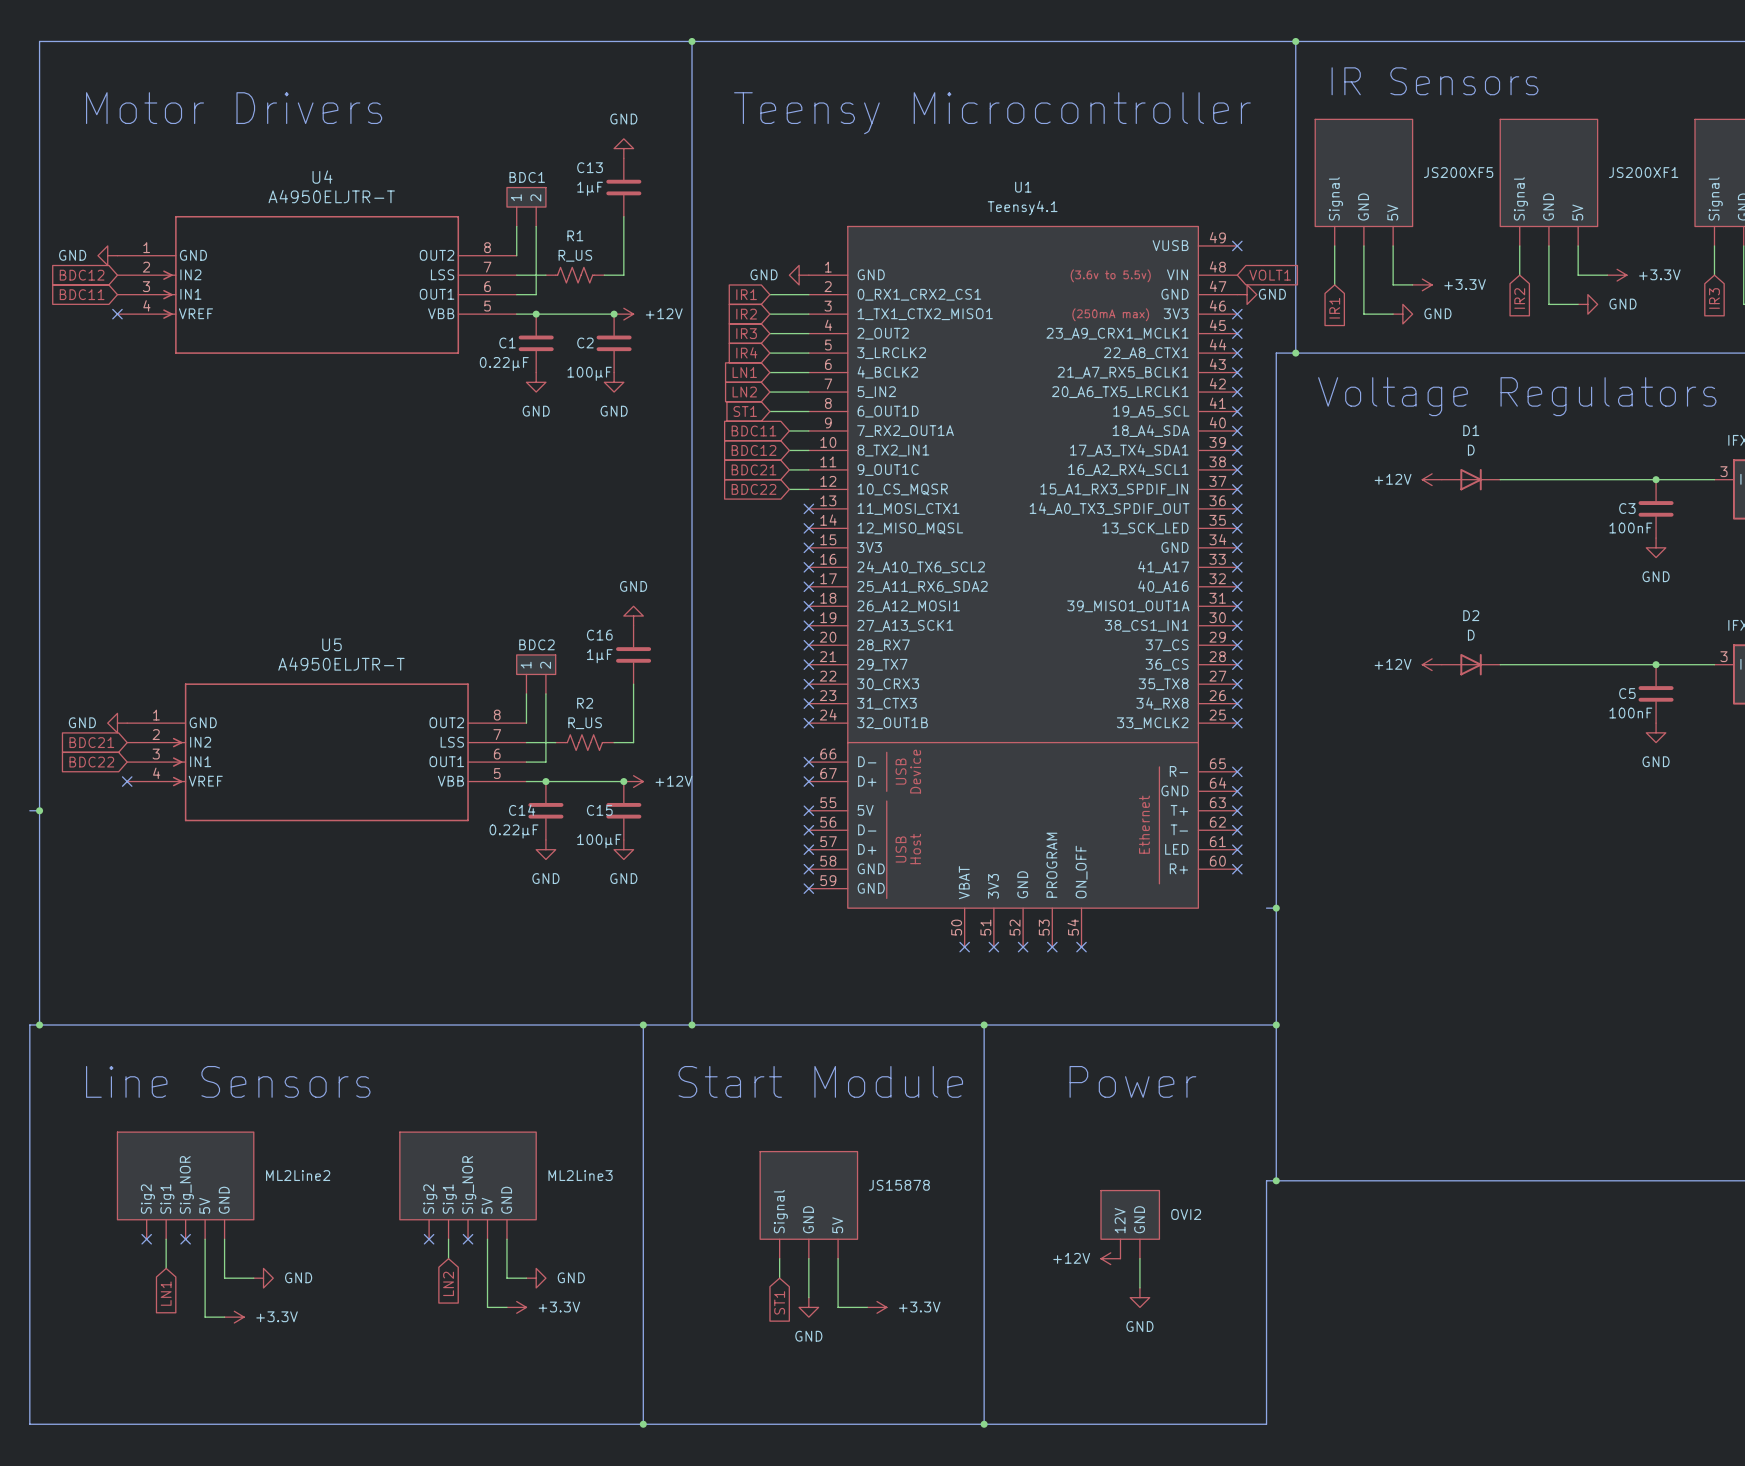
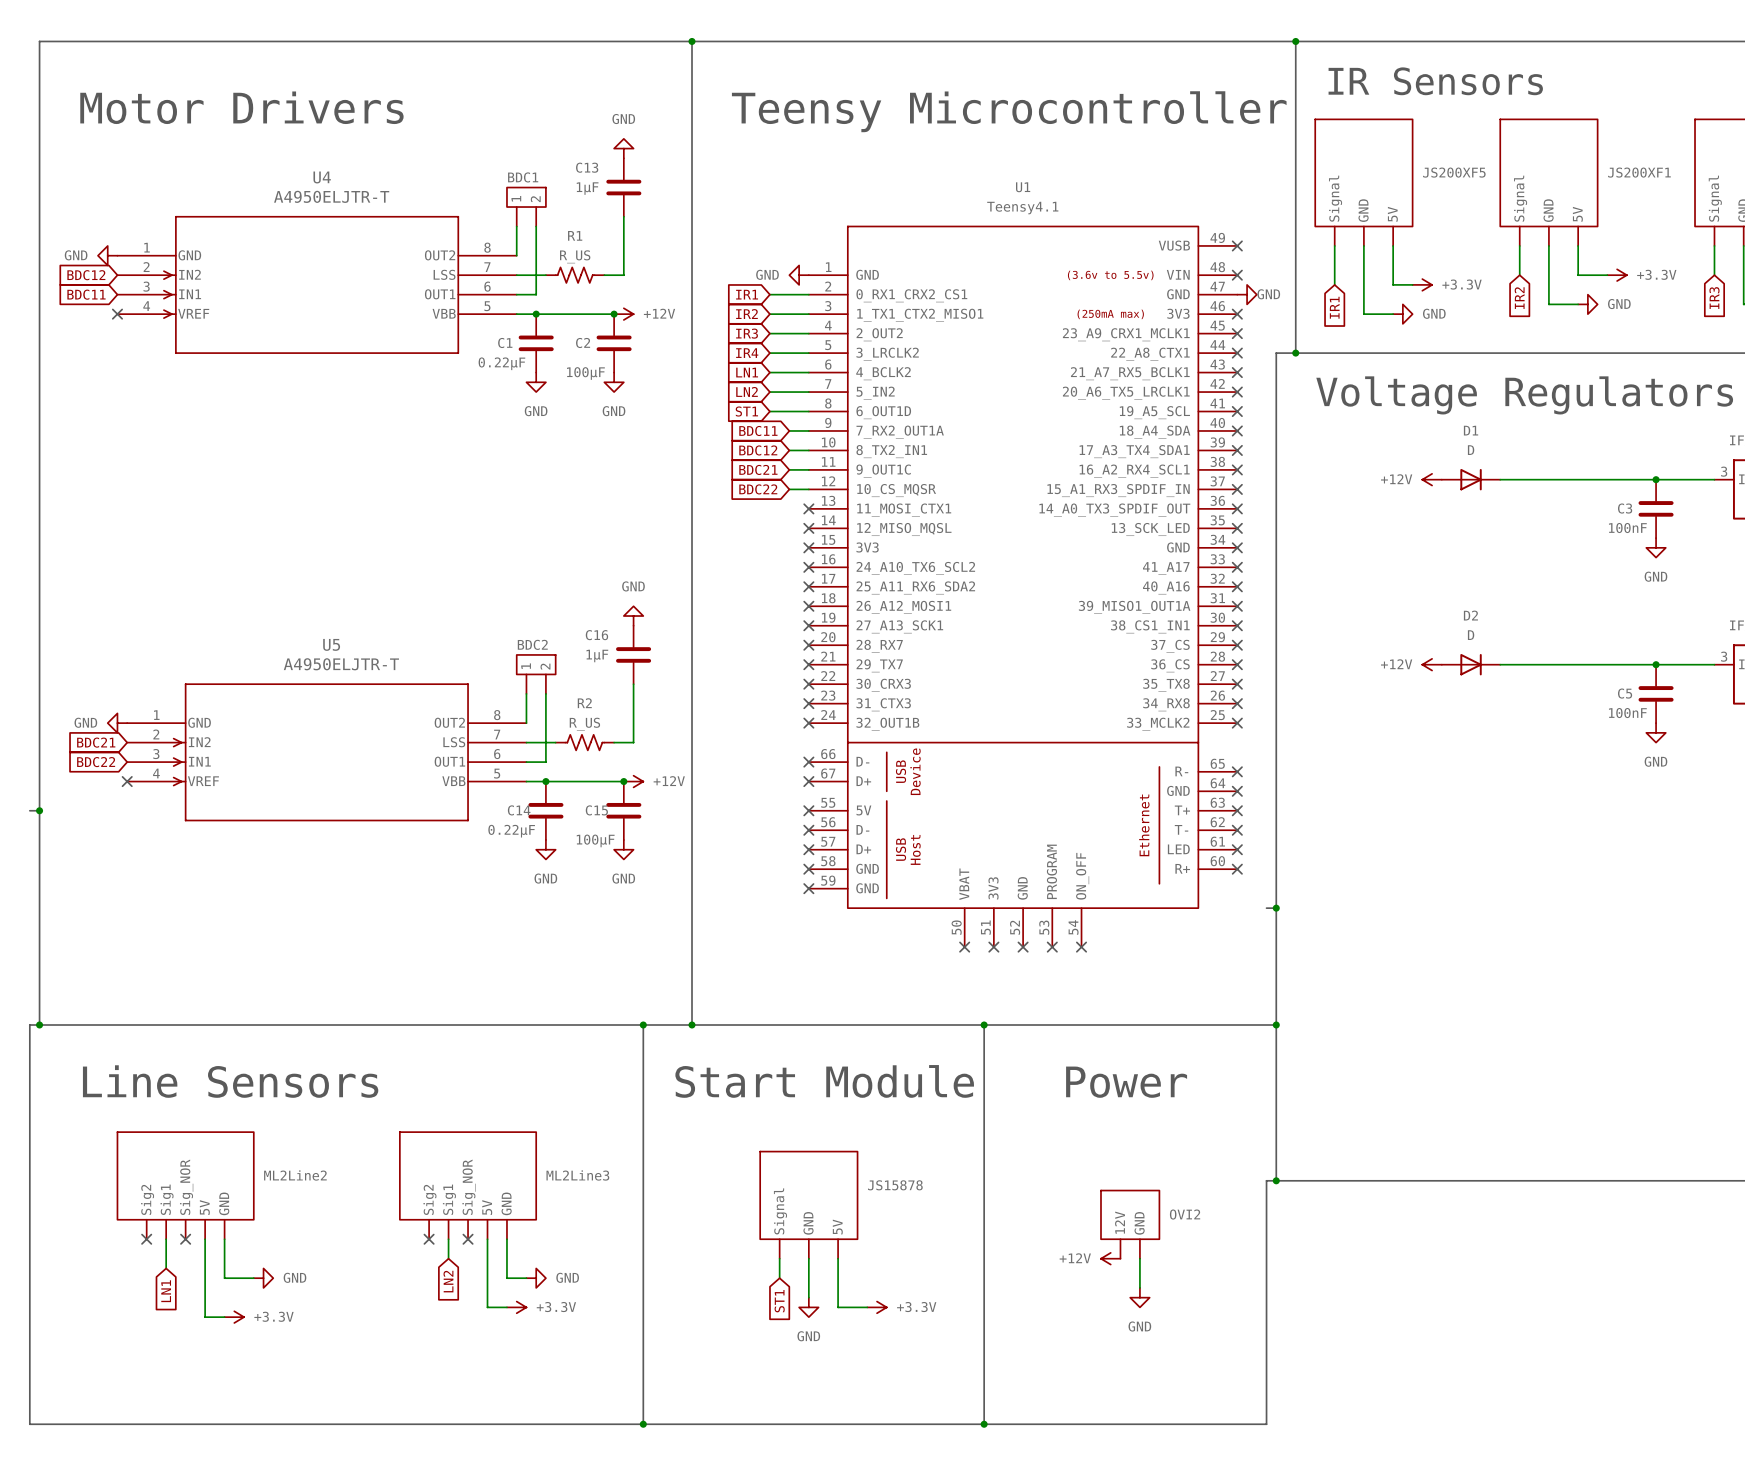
no-connect mark: none -> (1237, 275)
global label: VOLT1 (1270, 275) -> none

